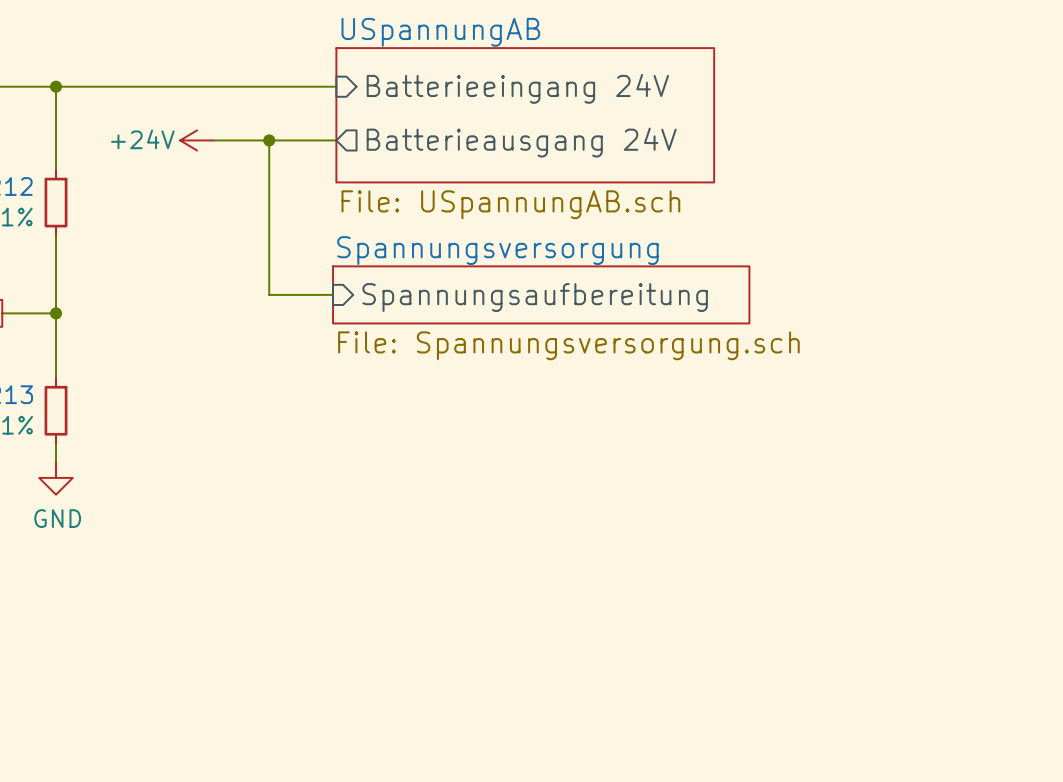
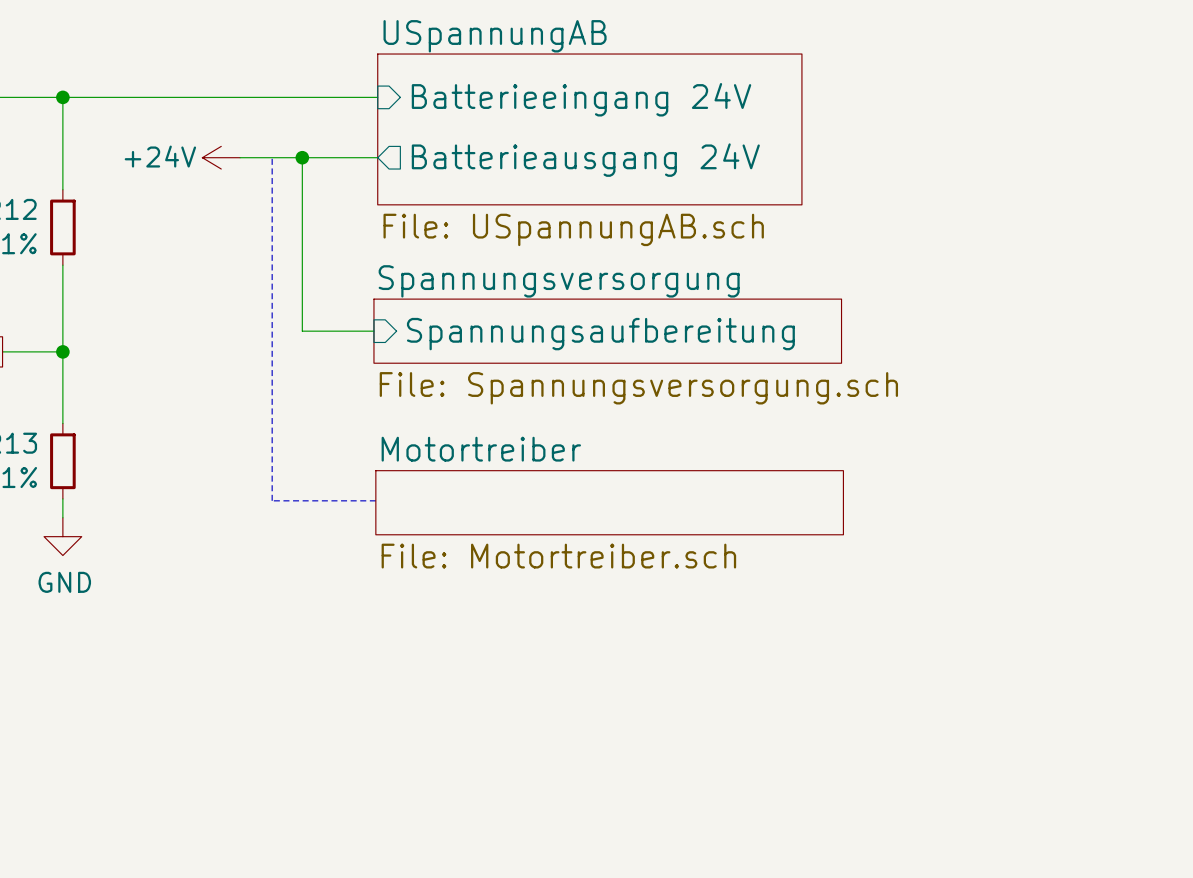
line: none -> (272, 157) (272, 500) (375, 500)
sheet Motortreiber: none -> File: Motortreiber.sch (609, 502)

